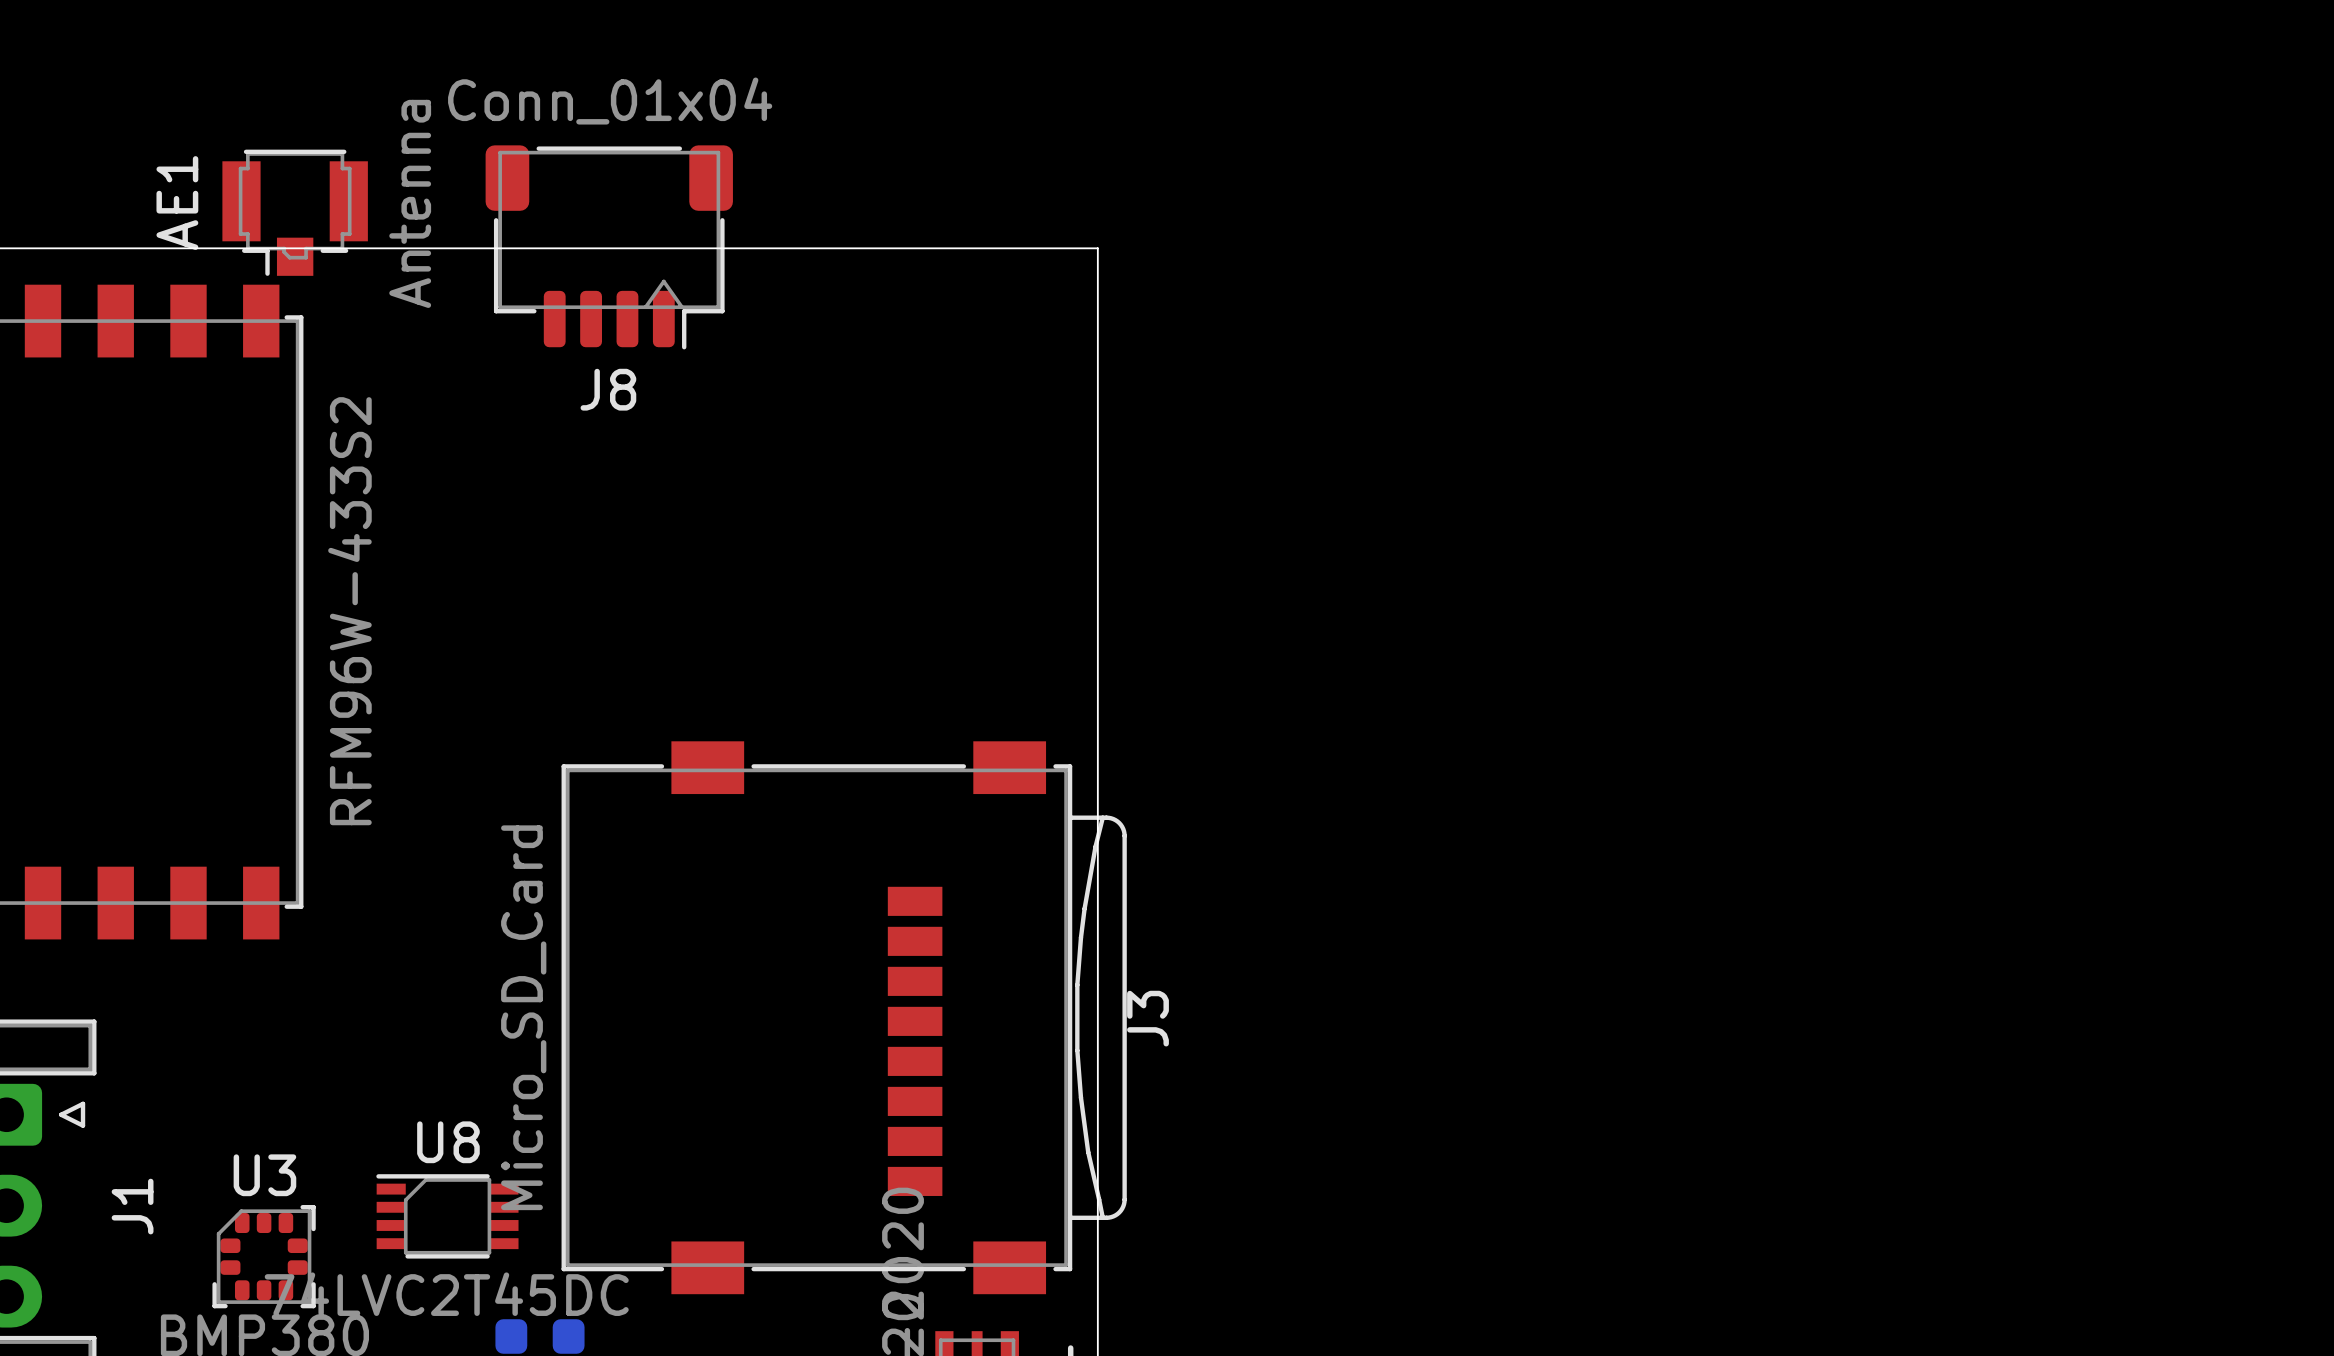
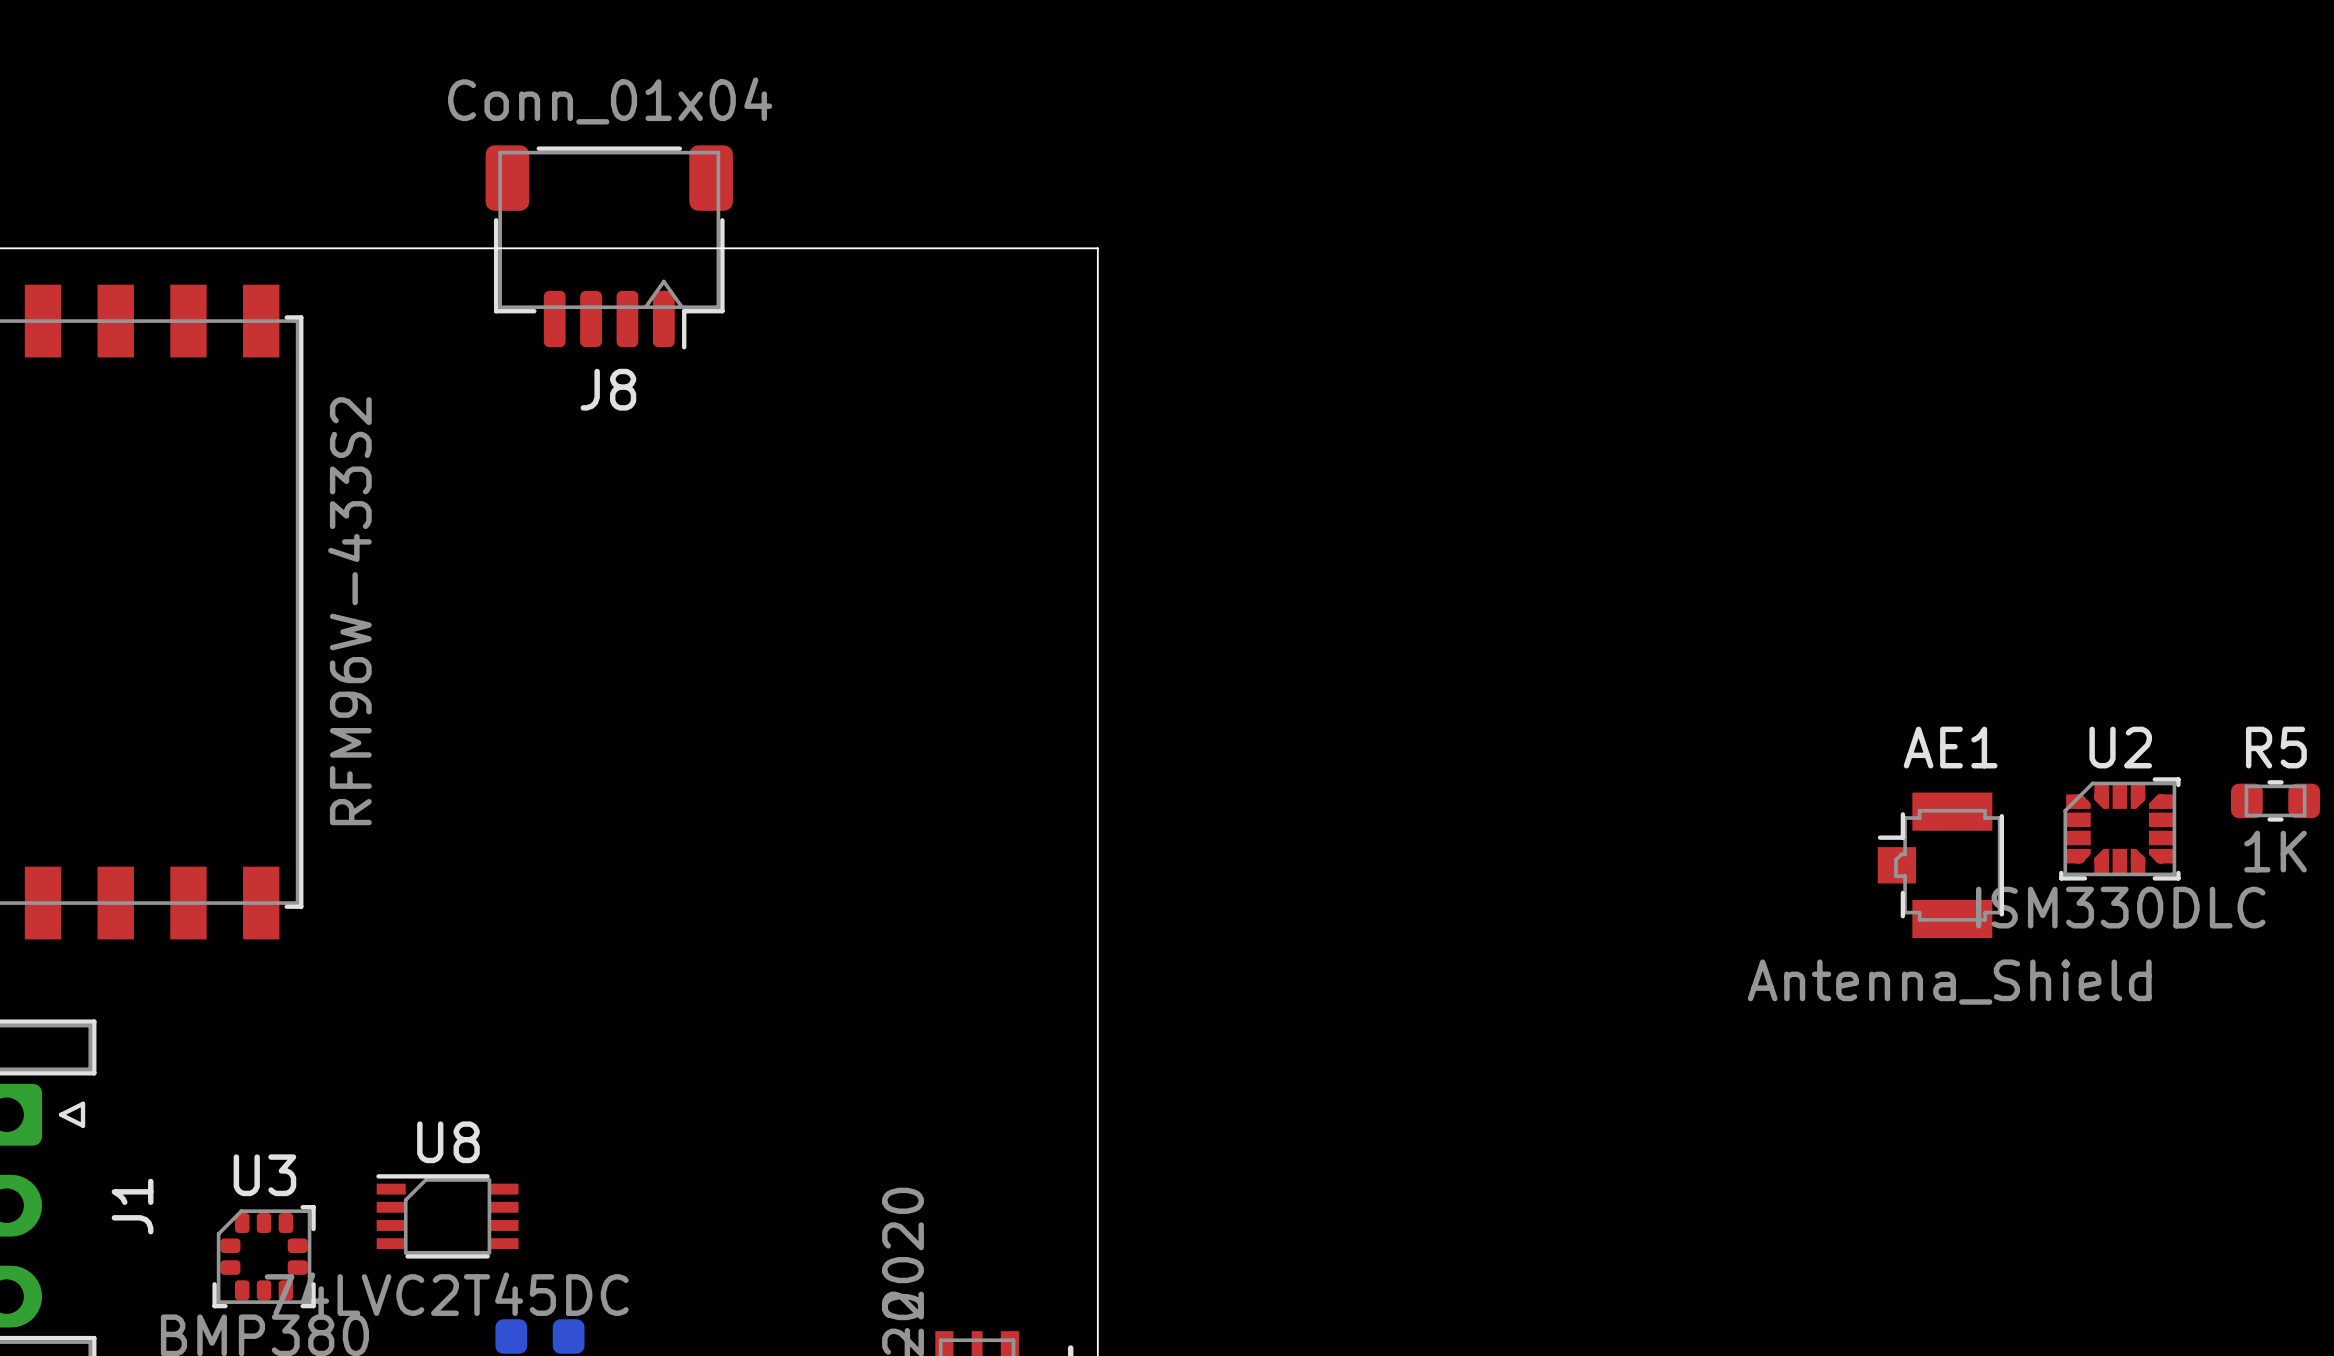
AE1 value: Antenna (410, 203) -> Antenna_Shield (1949, 982)
AE1 rotation: 0° (295, 212) -> 90° clockwise (1940, 865)
AE1 position: (295, 212) -> (1940, 865)
R5: none -> 1K (2275, 800)
U2: none -> ISM330DLC (2119, 828)
J3: Micro_SD_Card (844, 1017) -> none

